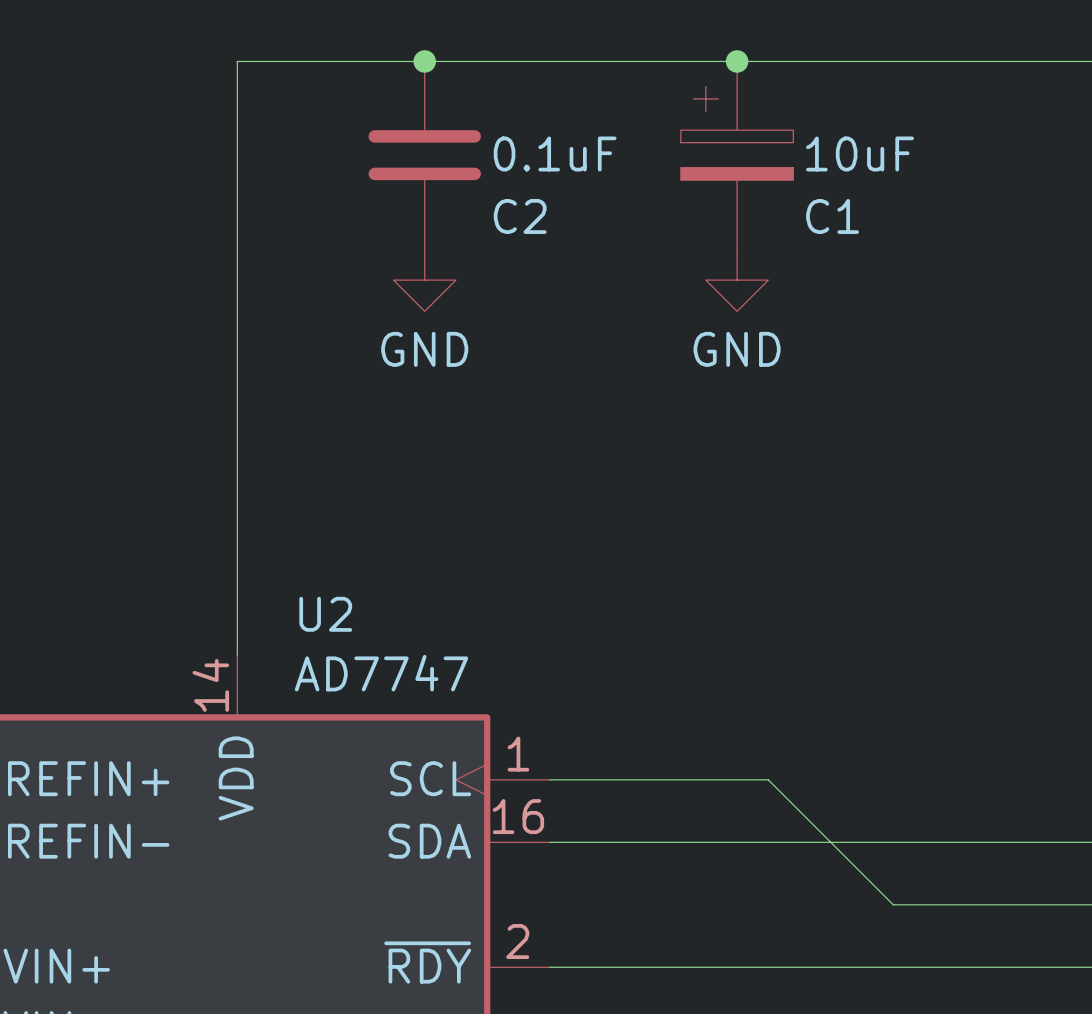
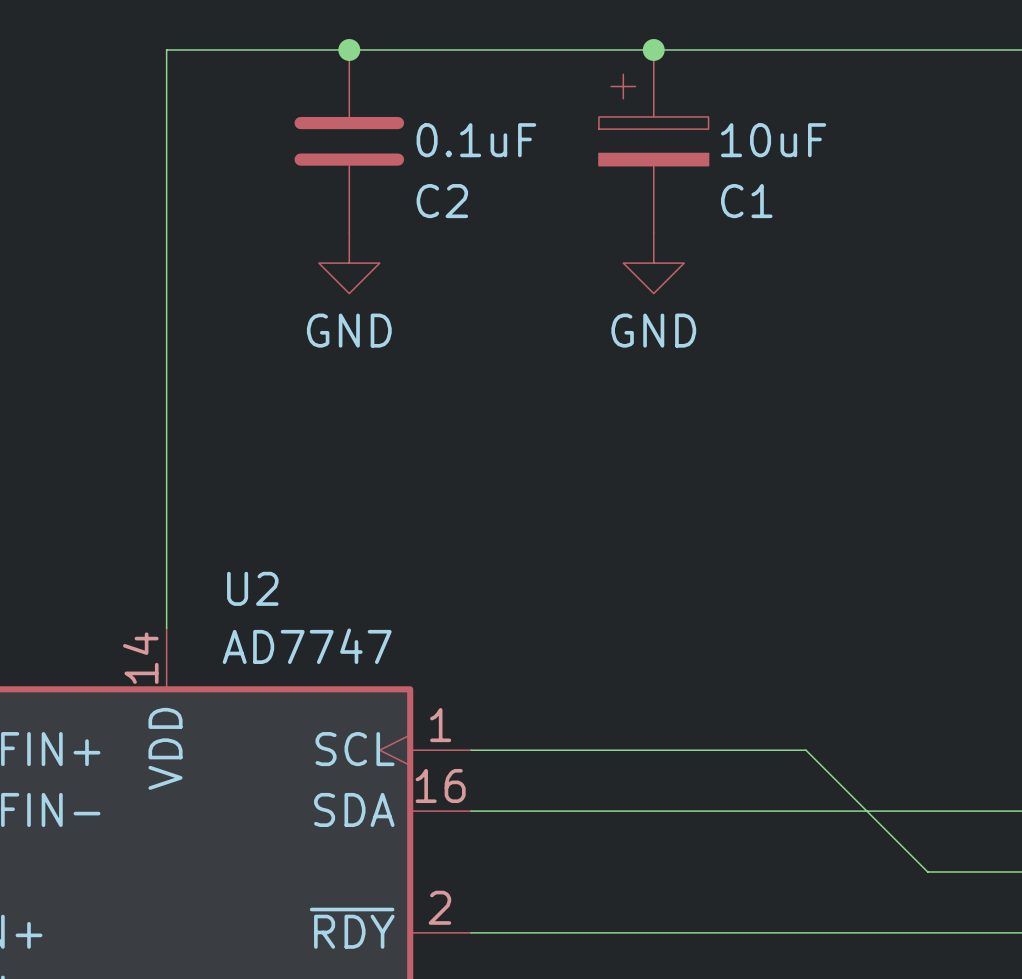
wire: (768, 779) (893, 904) (1018, 904) -> (684, 750) (805, 750) (927, 871)

